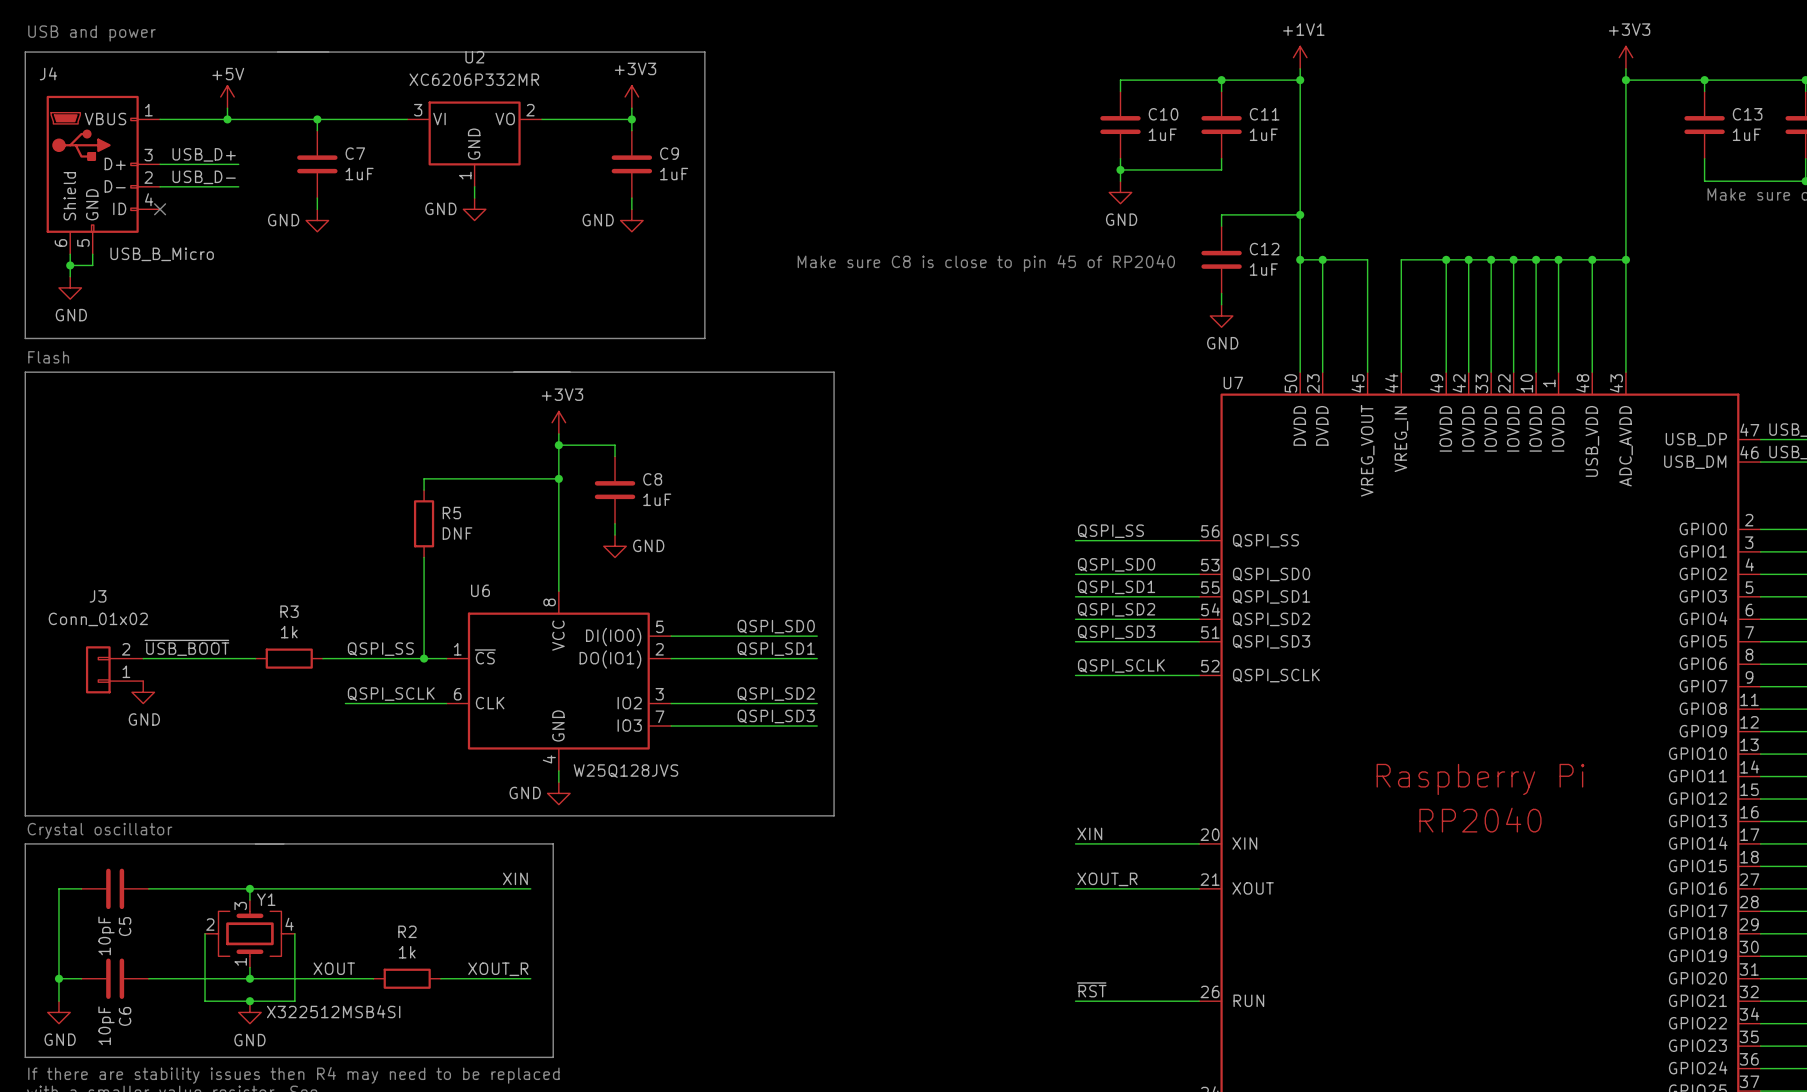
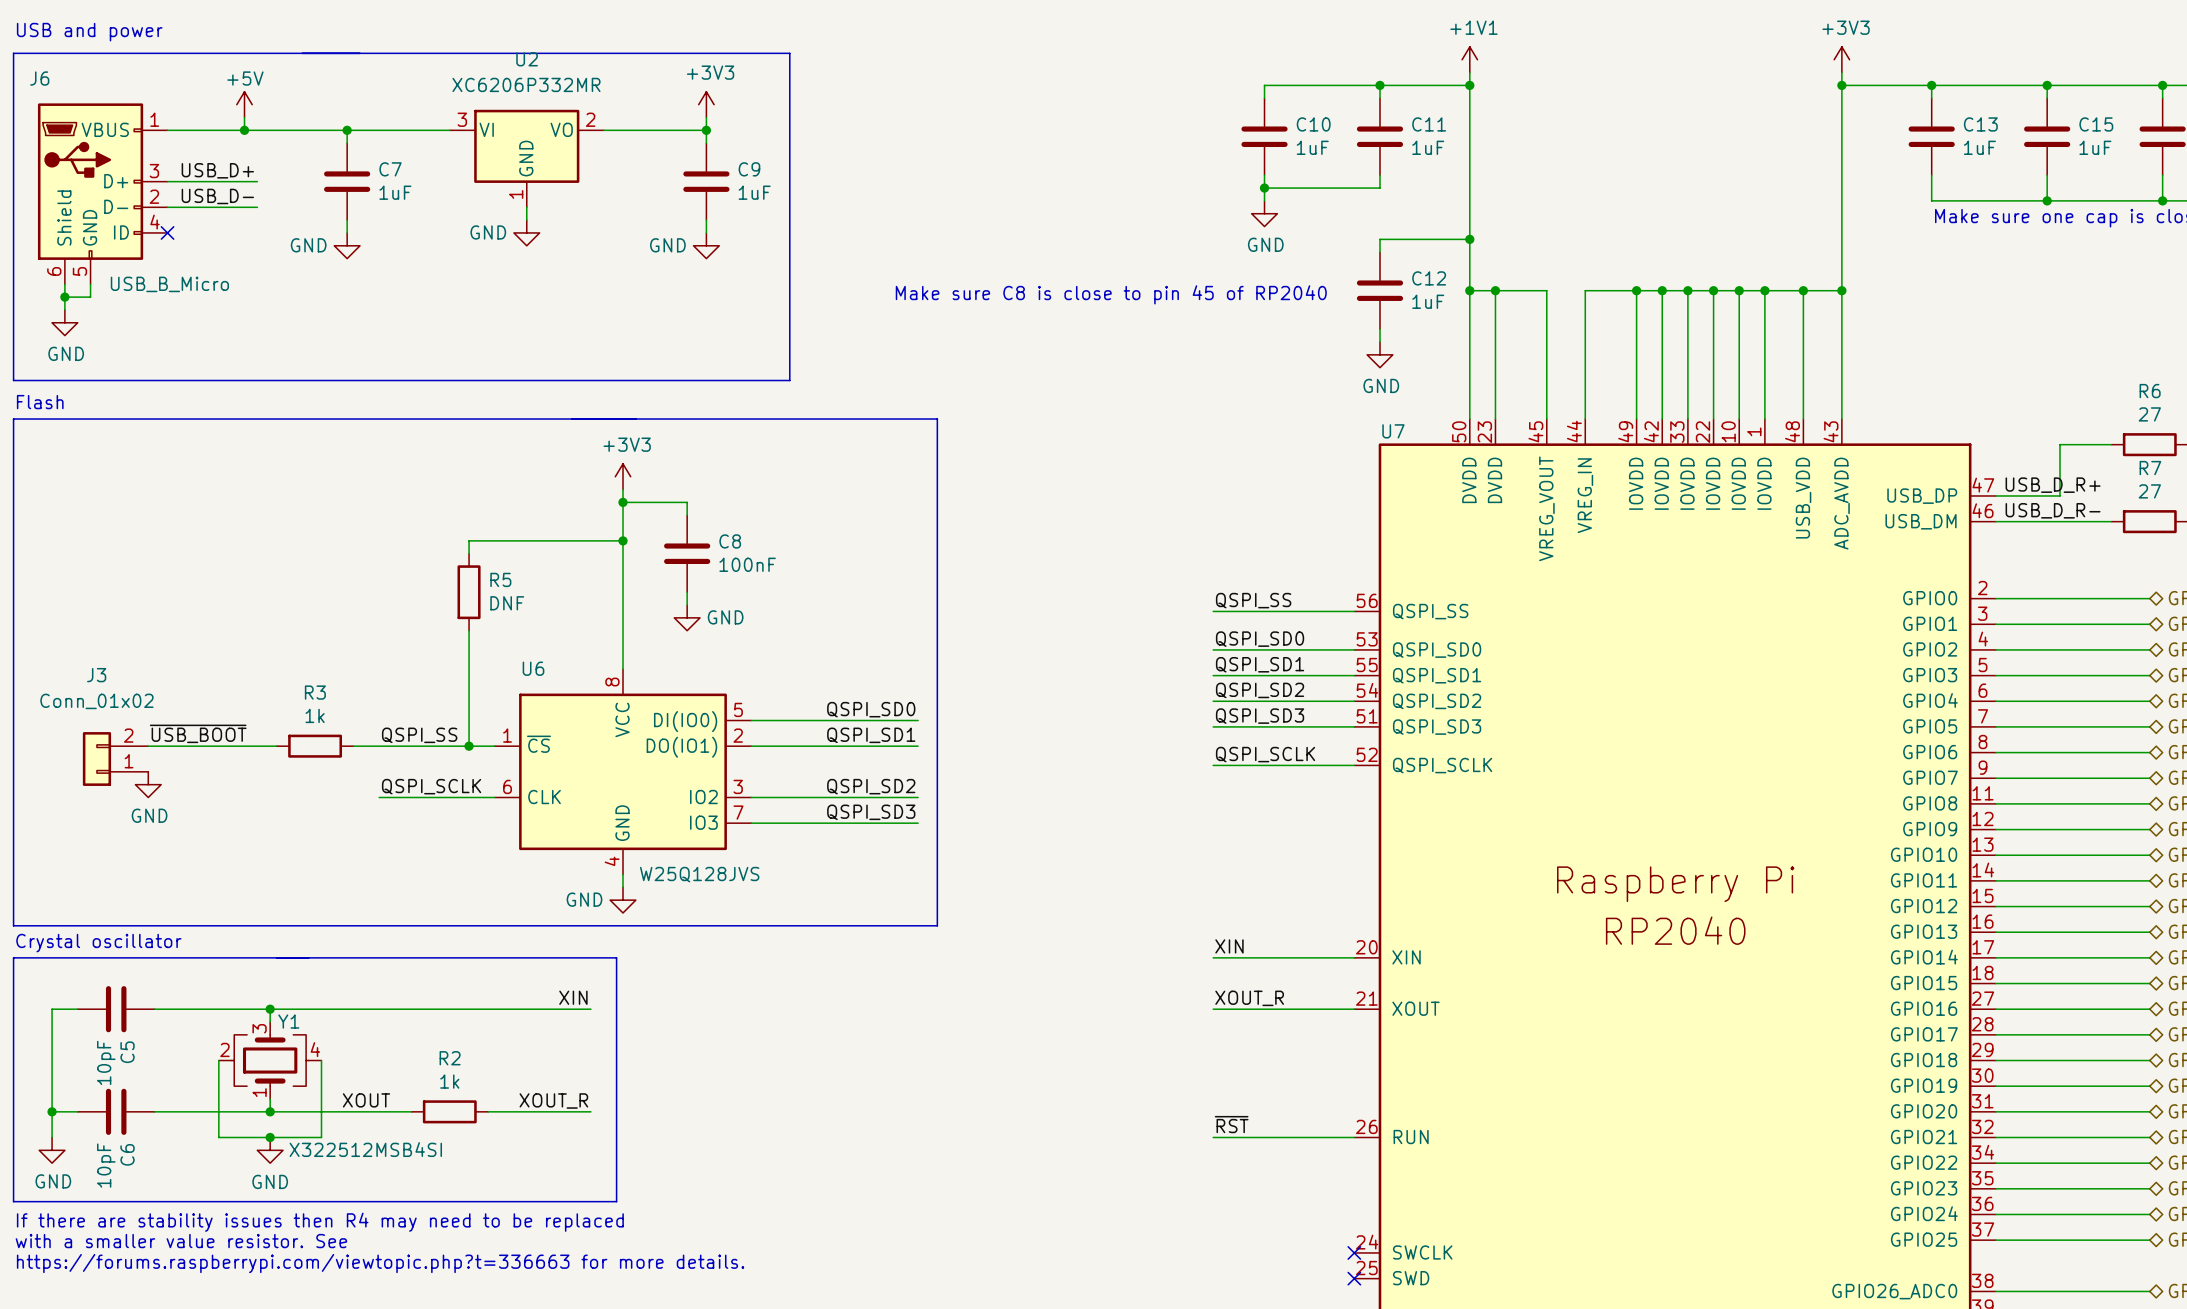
J4 name: J4 (48, 73) -> J6 (39, 78)
C8 value: 1uF (657, 499) -> 100nF (747, 564)

